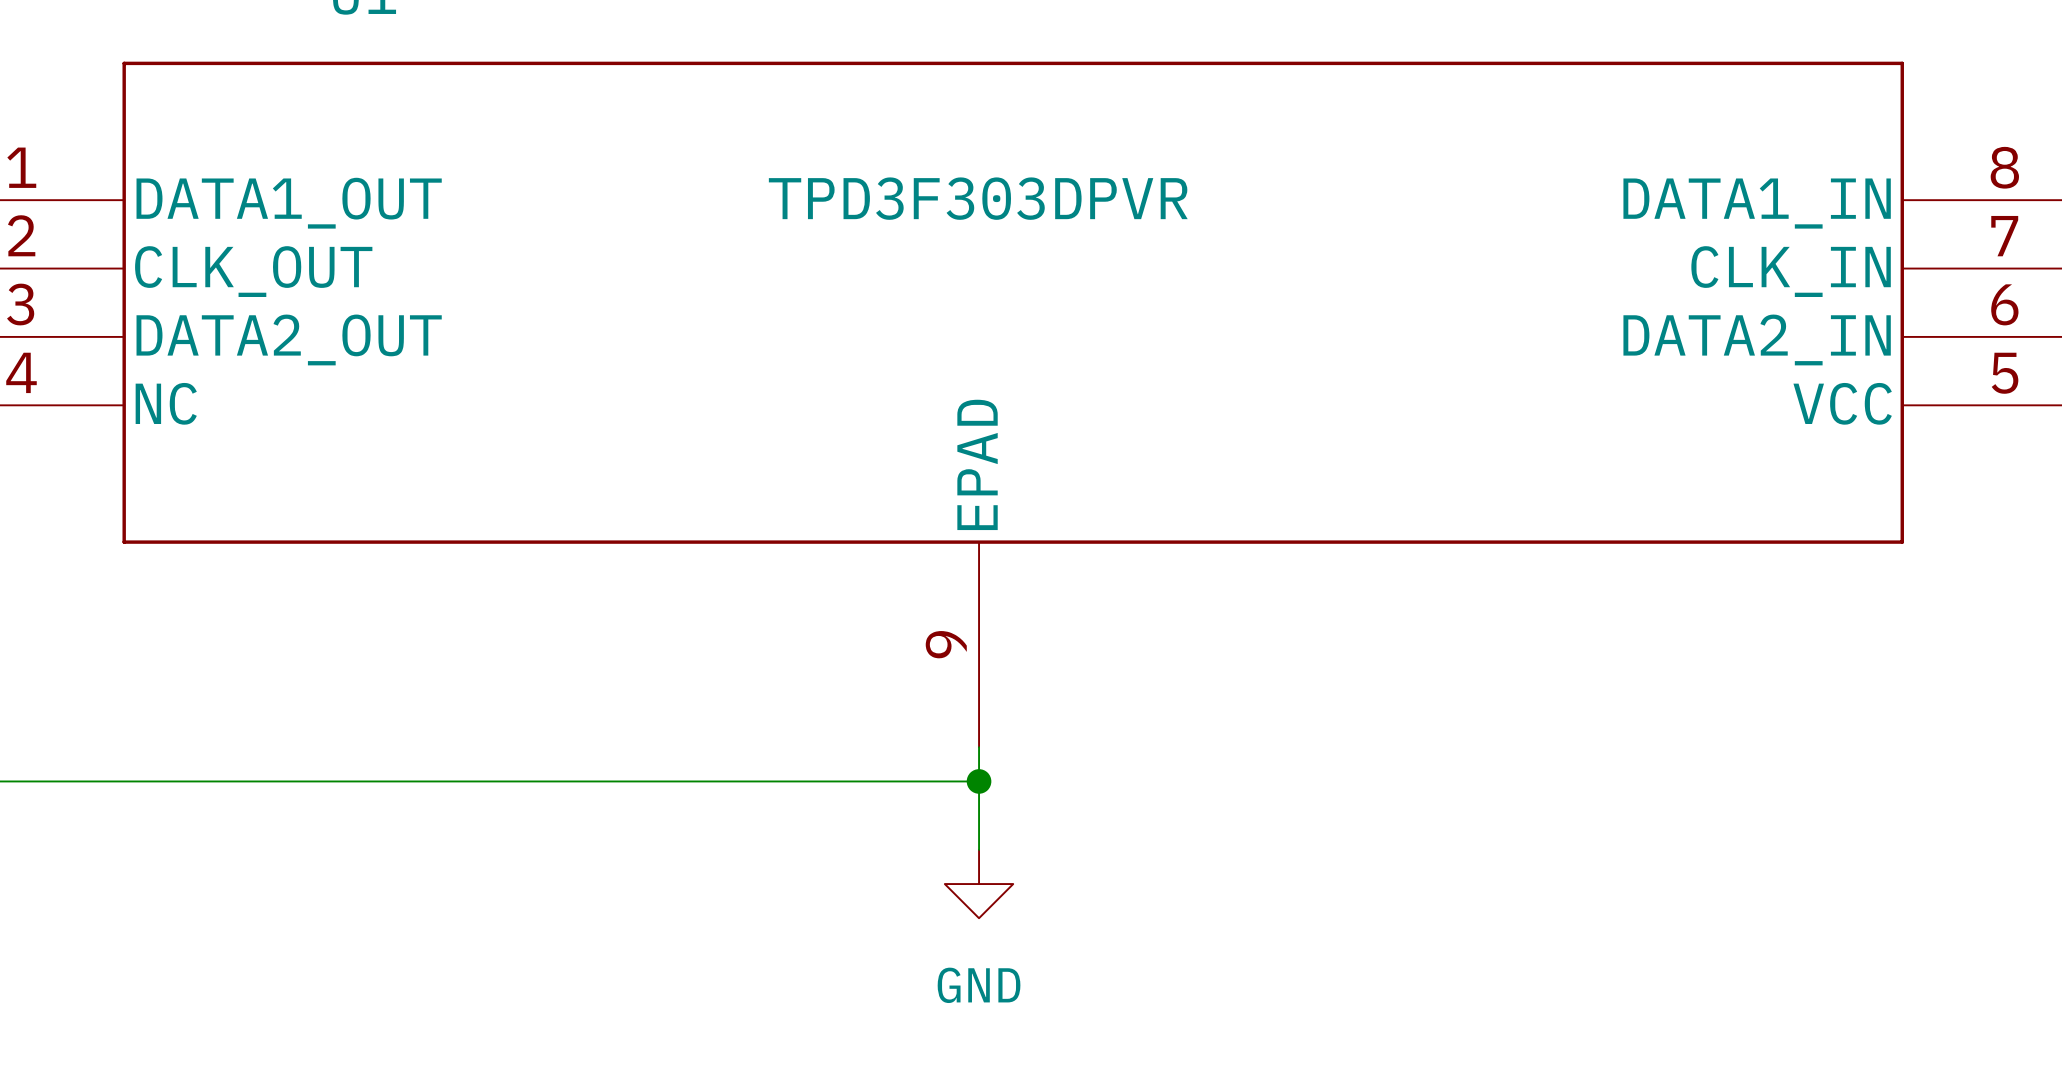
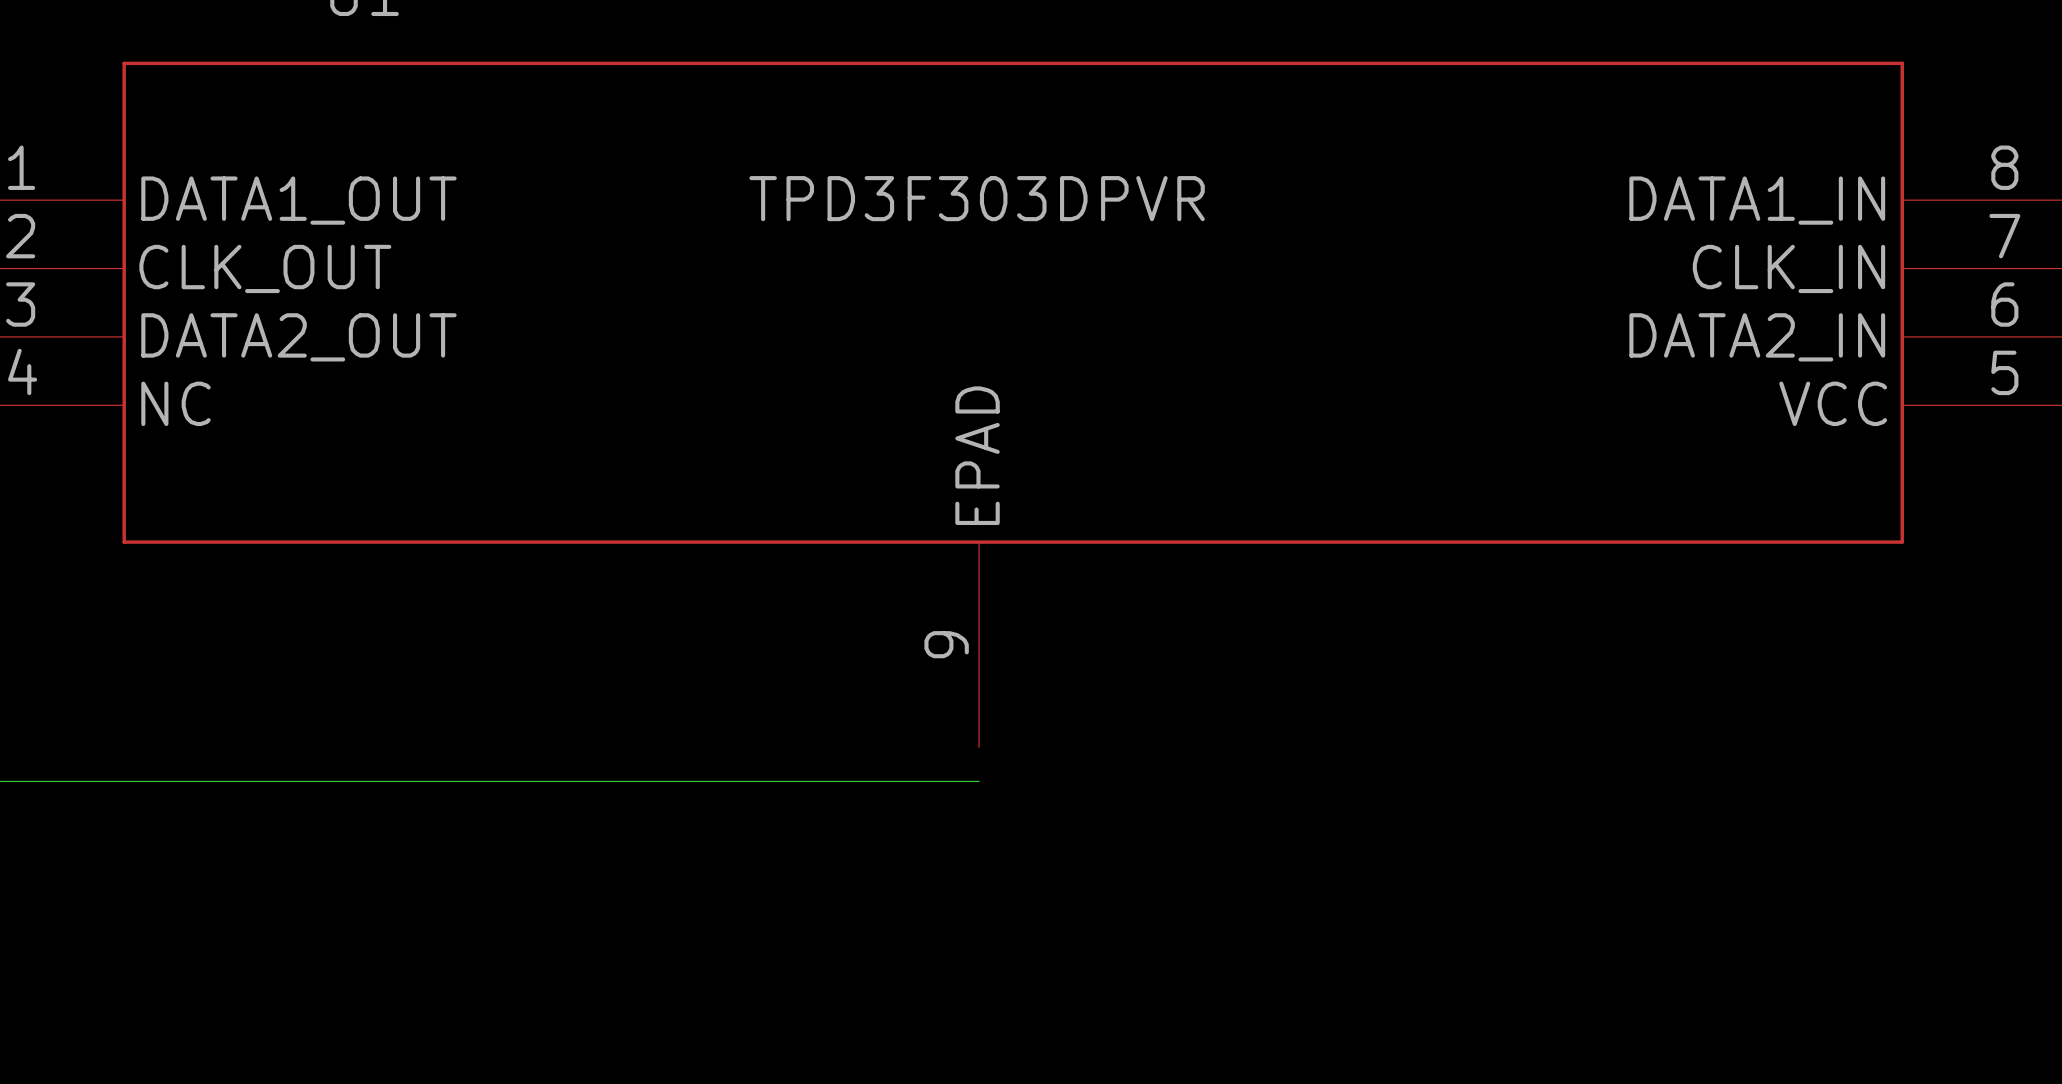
wire: (979, 747) (979, 849) -> none
junction: (979, 781) -> none
power symbol: GND (979, 884) -> none

